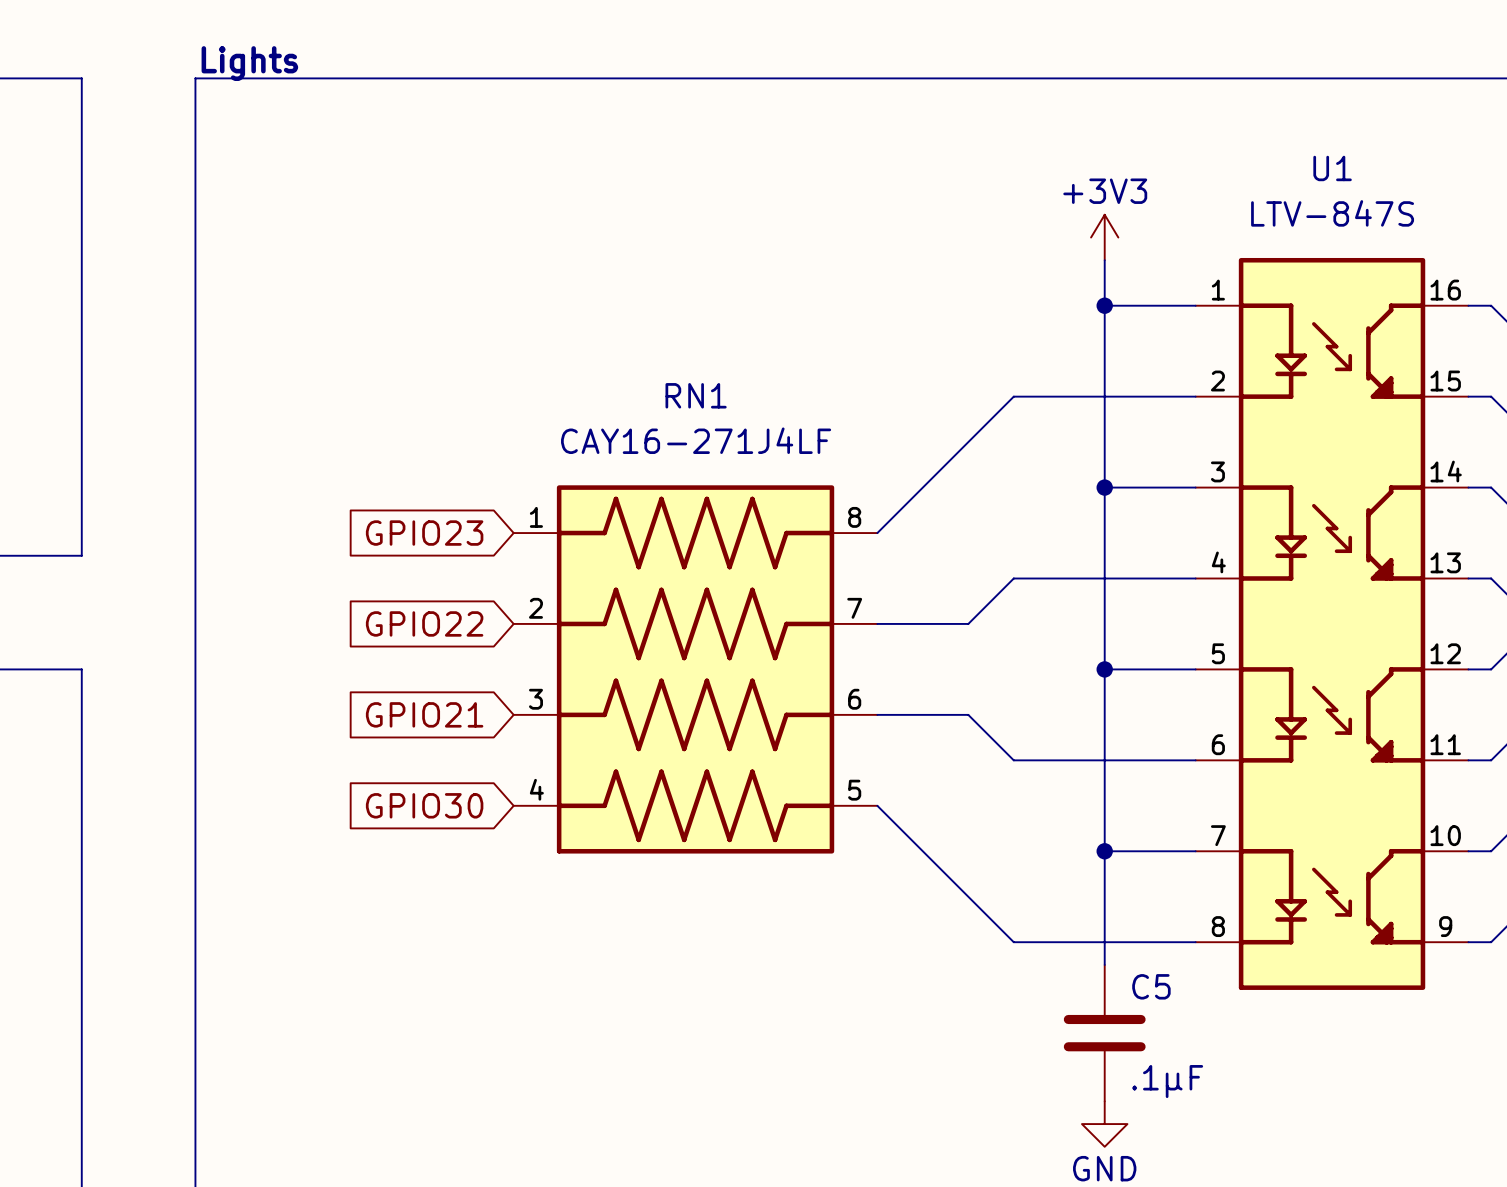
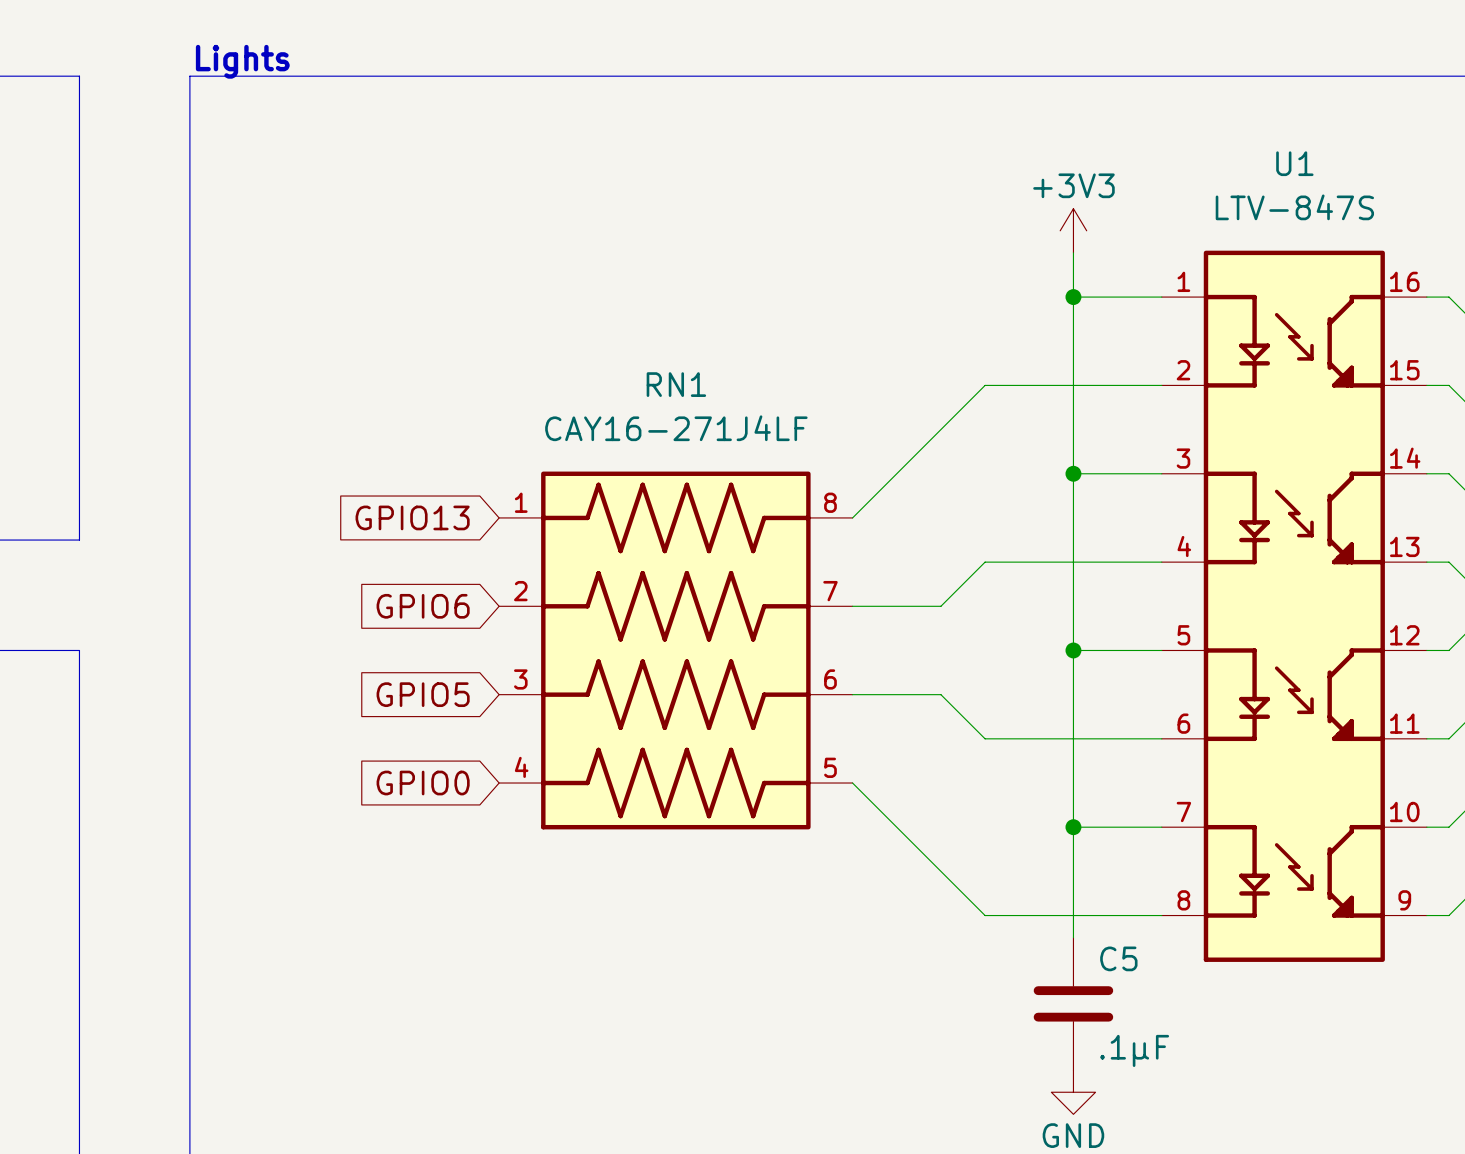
global label: GPIO23 (424, 533) -> GPIO13 (412, 517)
global label: GPIO22 (424, 623) -> GPIO6 (423, 606)
global label: GPIO21 (424, 714) -> GPIO5 (423, 694)
global label: GPIO30 (424, 805) -> GPIO0 (423, 783)

